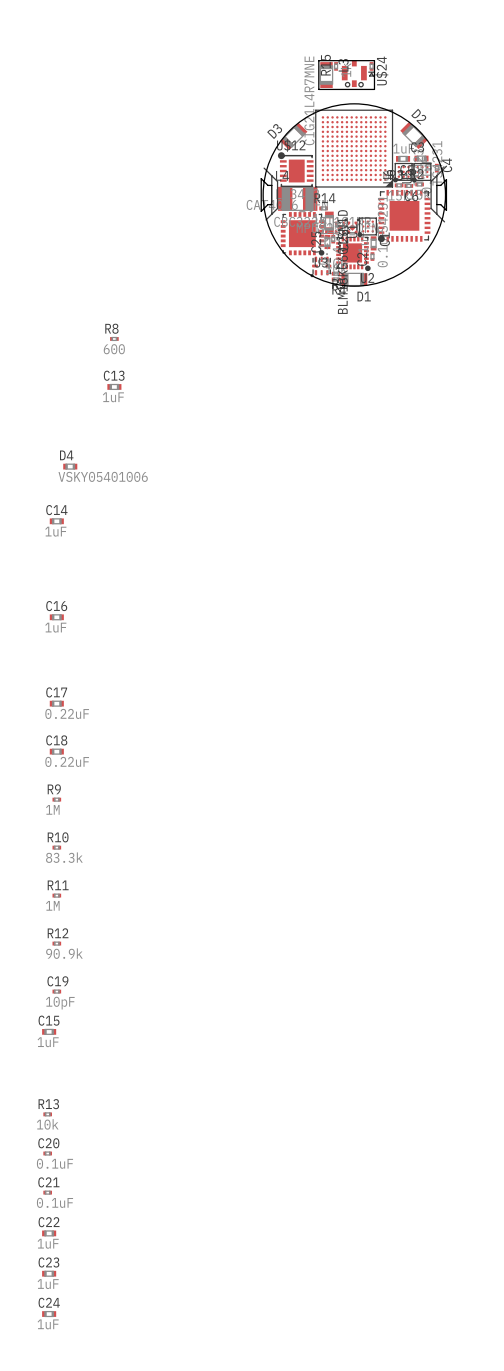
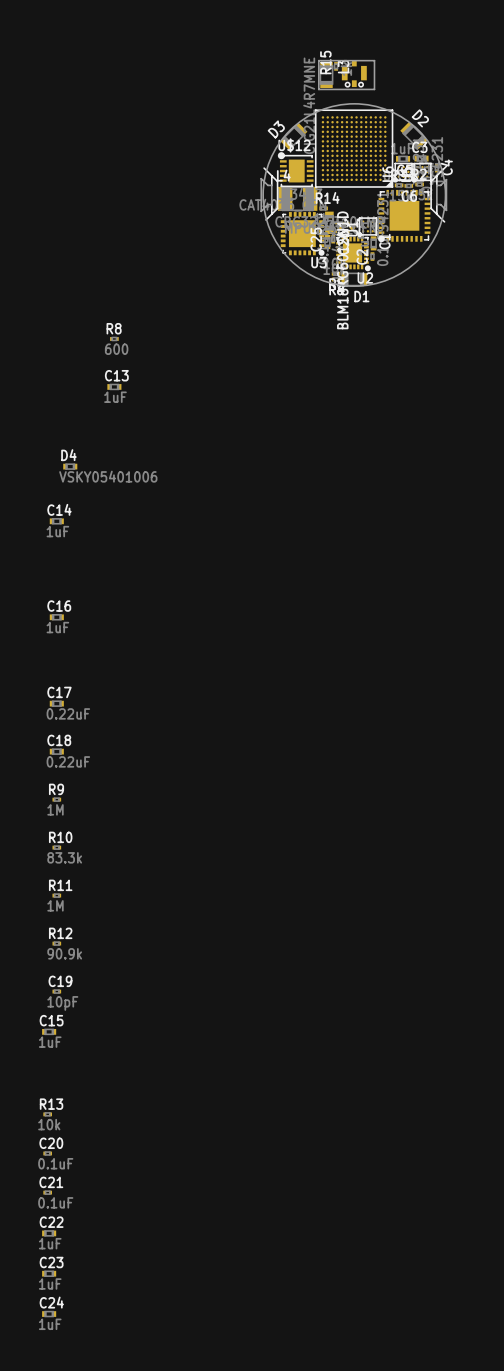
U$24: (371, 69) -> none
part: (320, 266) -> none

